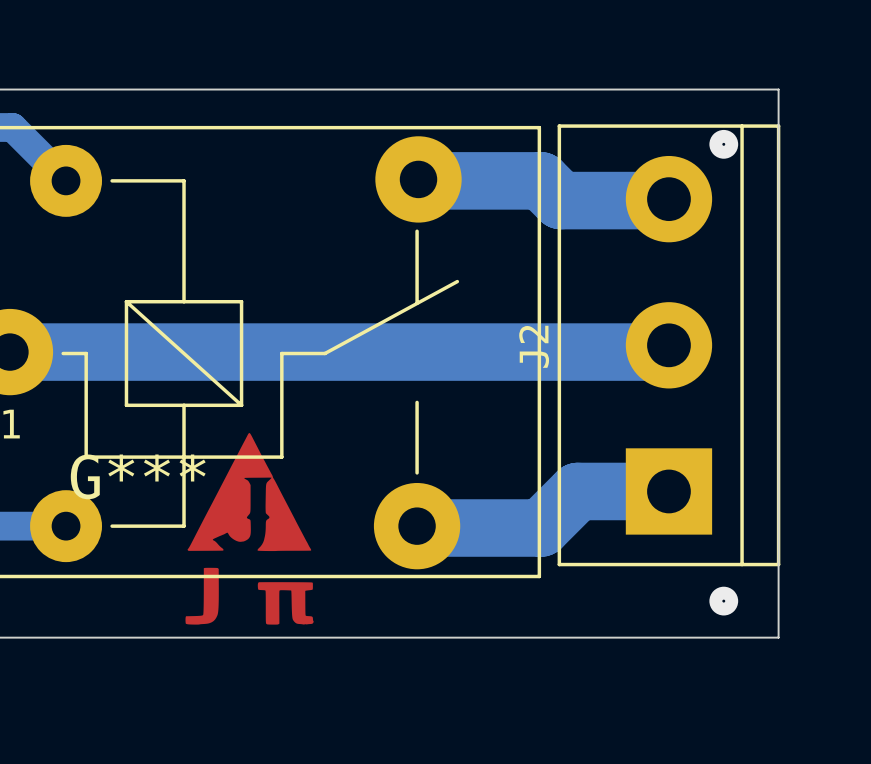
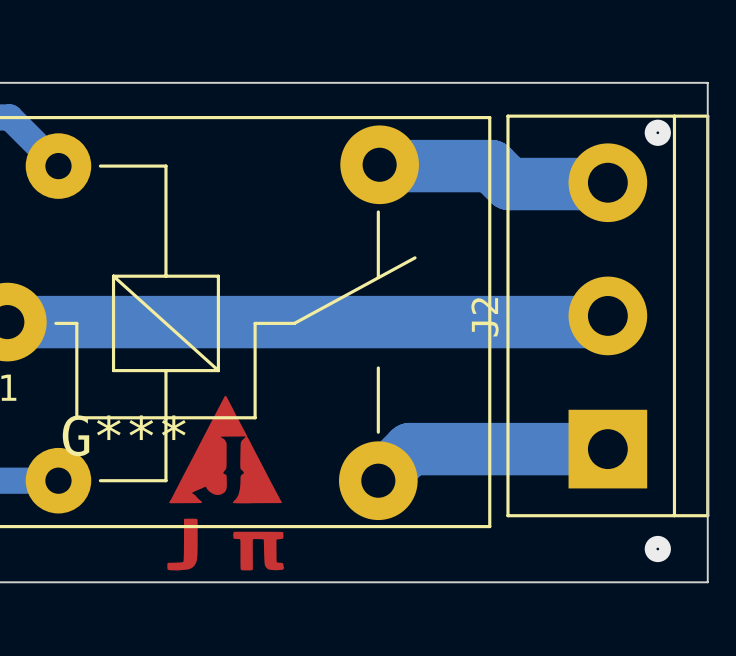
bottom track: (577, 491) (541, 528) (418, 528) (417, 526) -> (524, 449) (409, 449) (378, 480)

